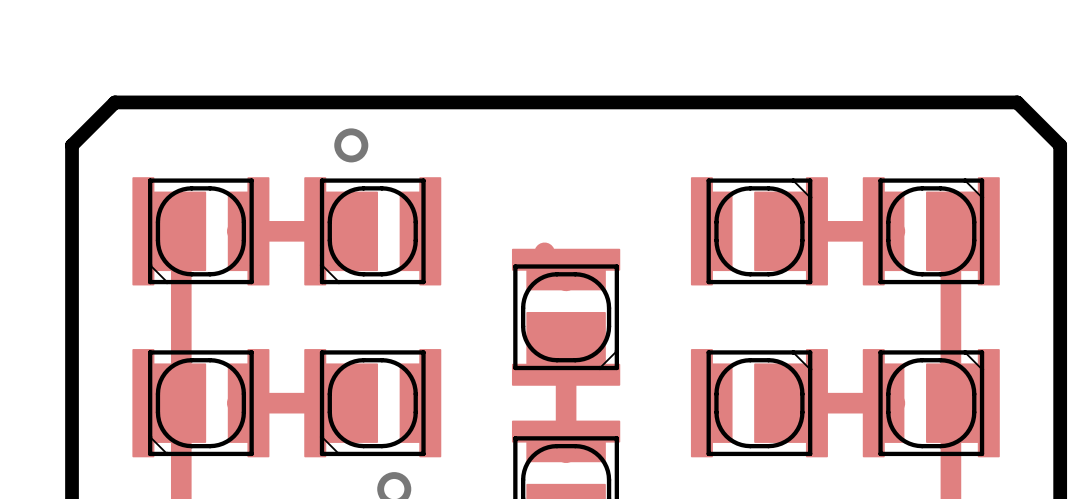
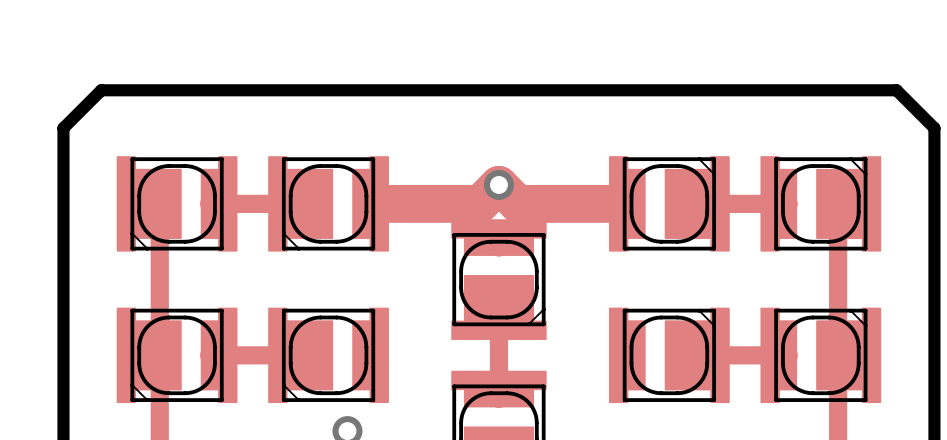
via: (351, 145) -> none
via: none -> (498, 184)
track: none -> (360, 203) (480, 203) (498, 184) (517, 203) (637, 203)

